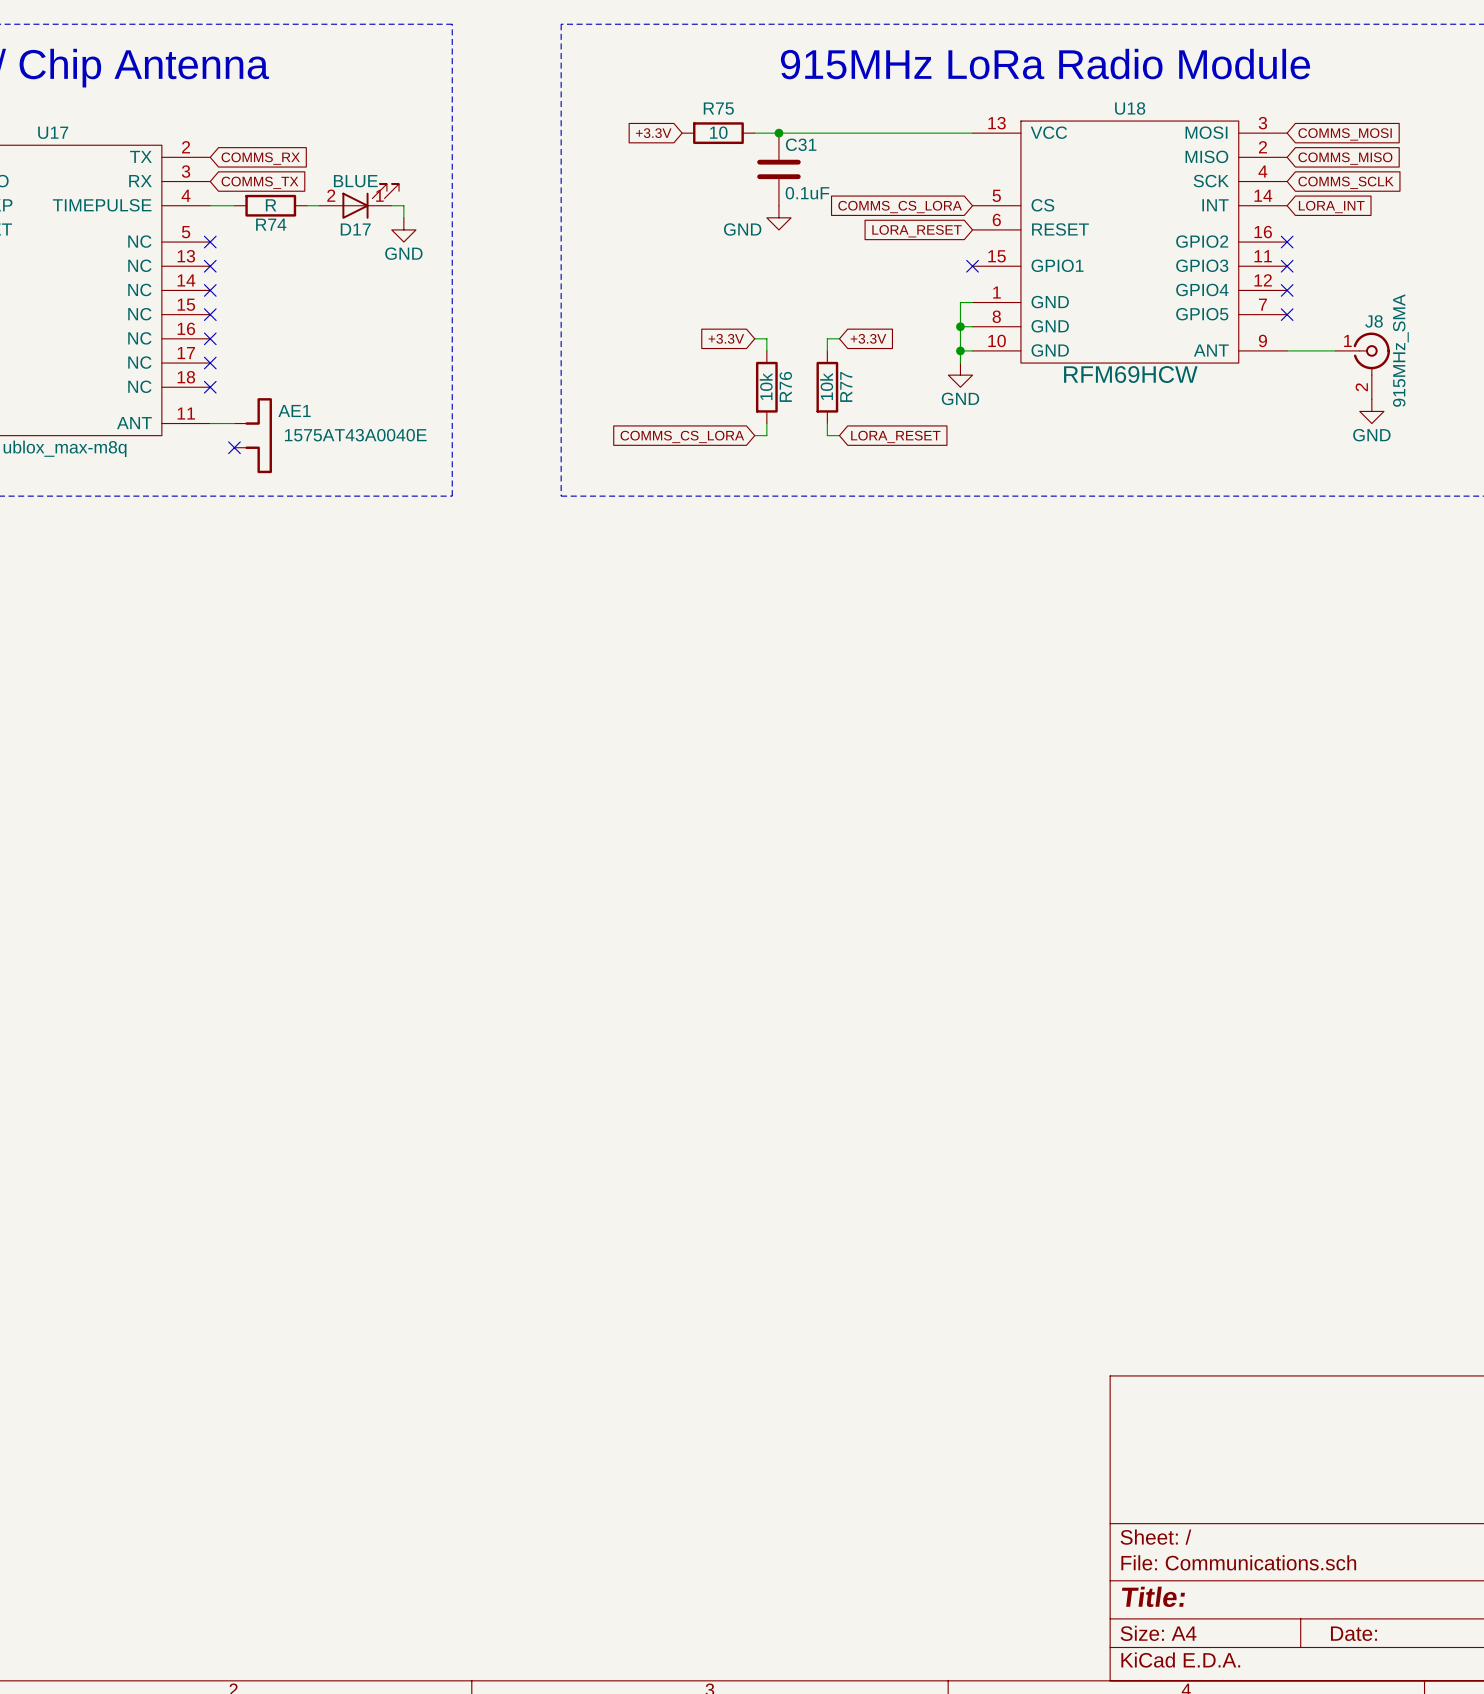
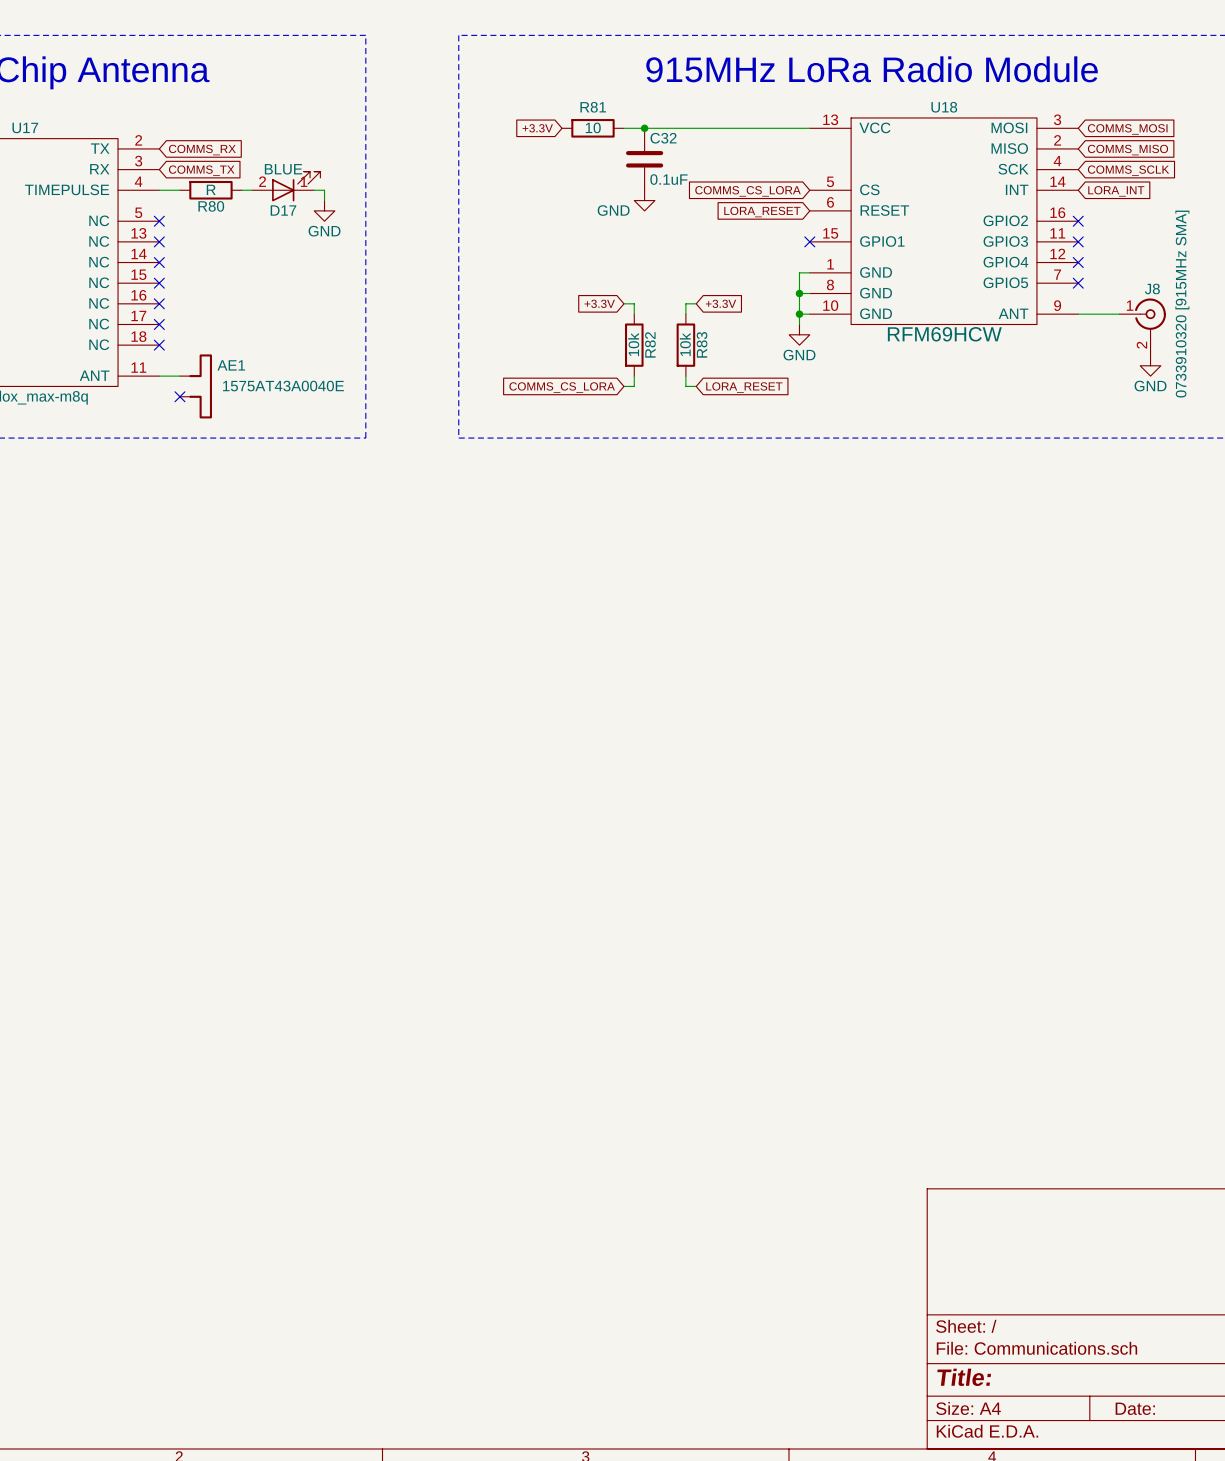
R75 name: R75 (718, 108) -> R81 (593, 107)
C31 name: C31 (801, 144) -> C32 (663, 138)
R74 name: R74 (271, 224) -> R80 (211, 206)
J8 value: 915MHz_SMA (1400, 350) -> 0733910320 [915MHz SMA] (1182, 304)
R76 name: R76 (785, 386) -> R82 (650, 344)
R77 name: R77 (846, 386) -> R83 (702, 344)

